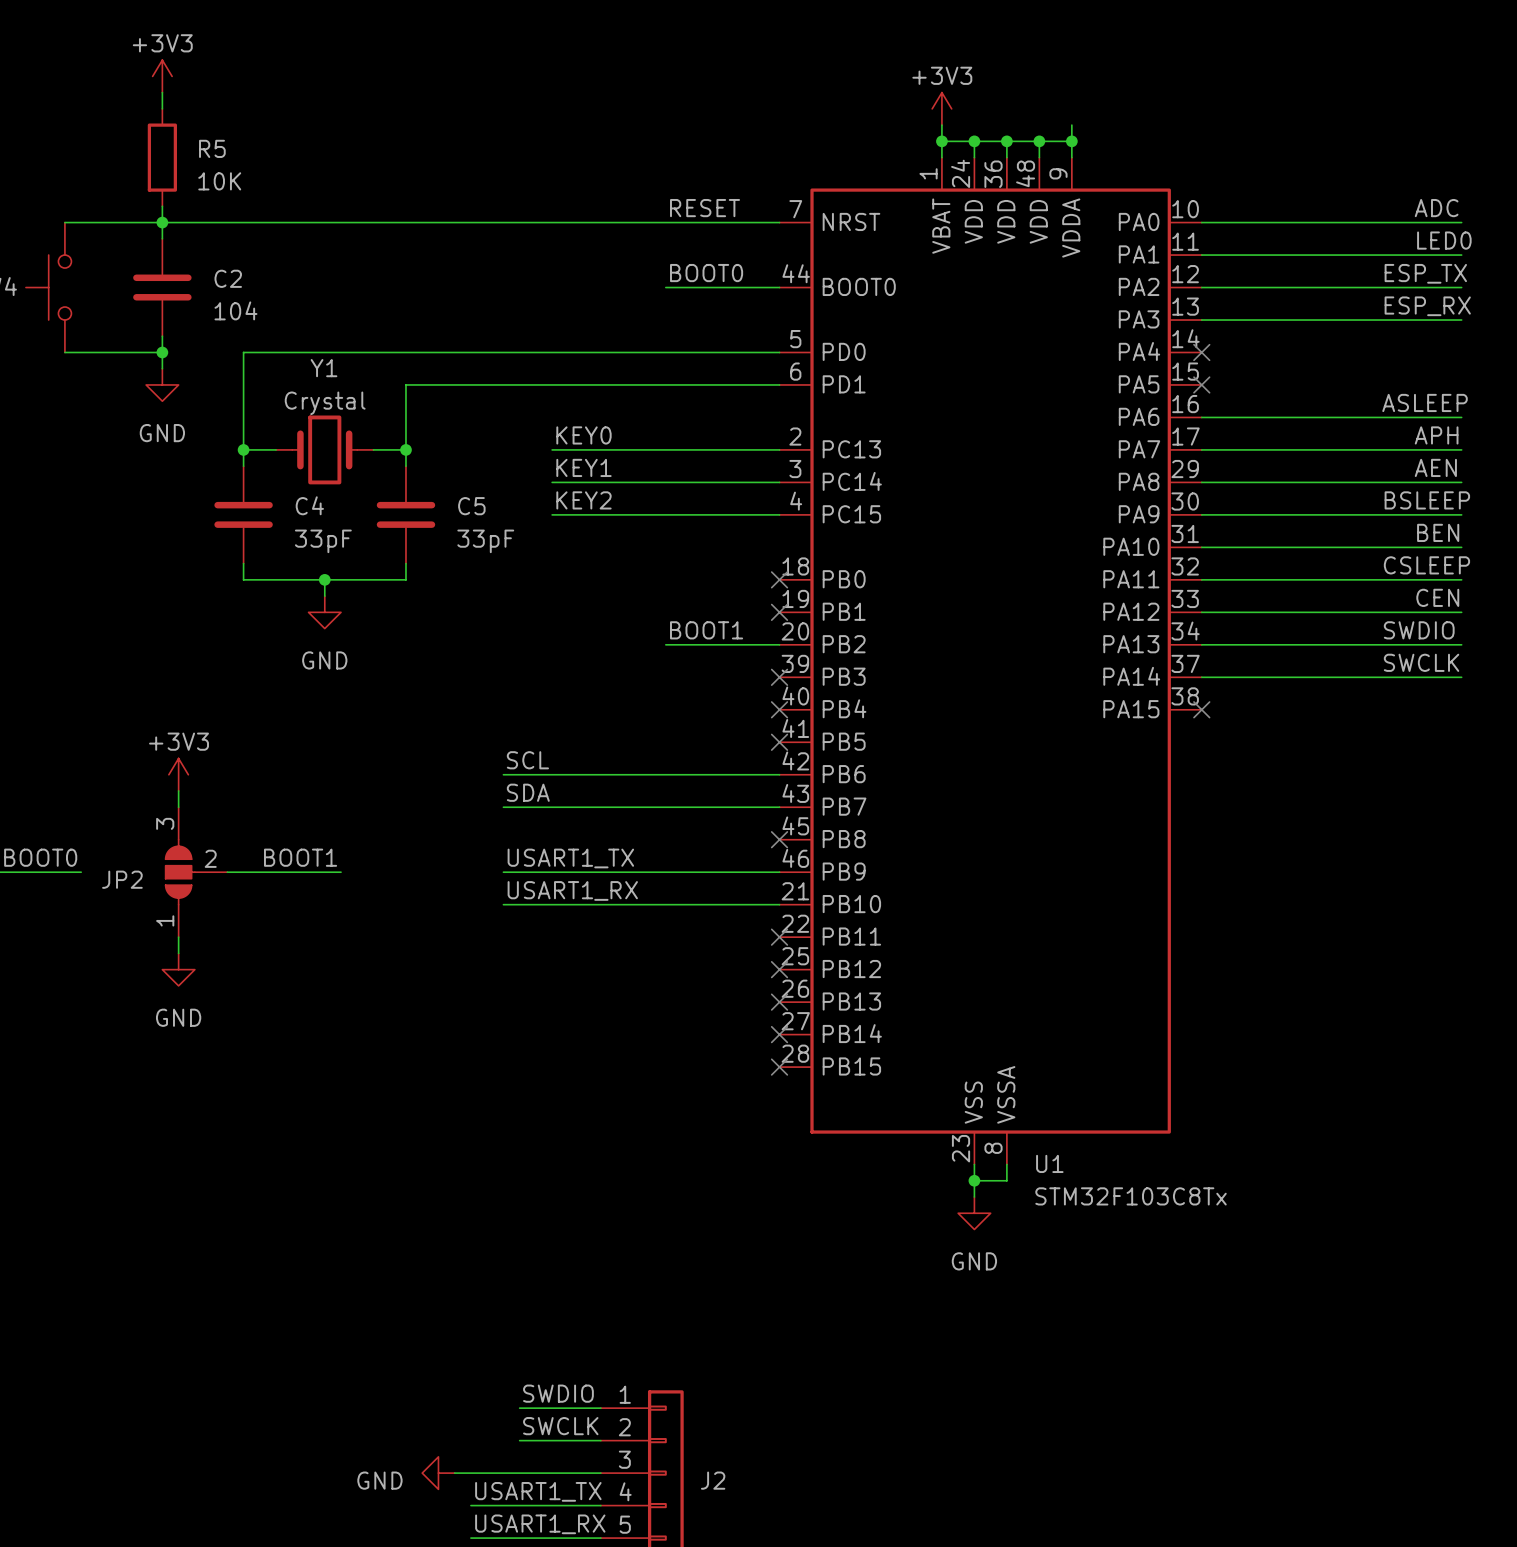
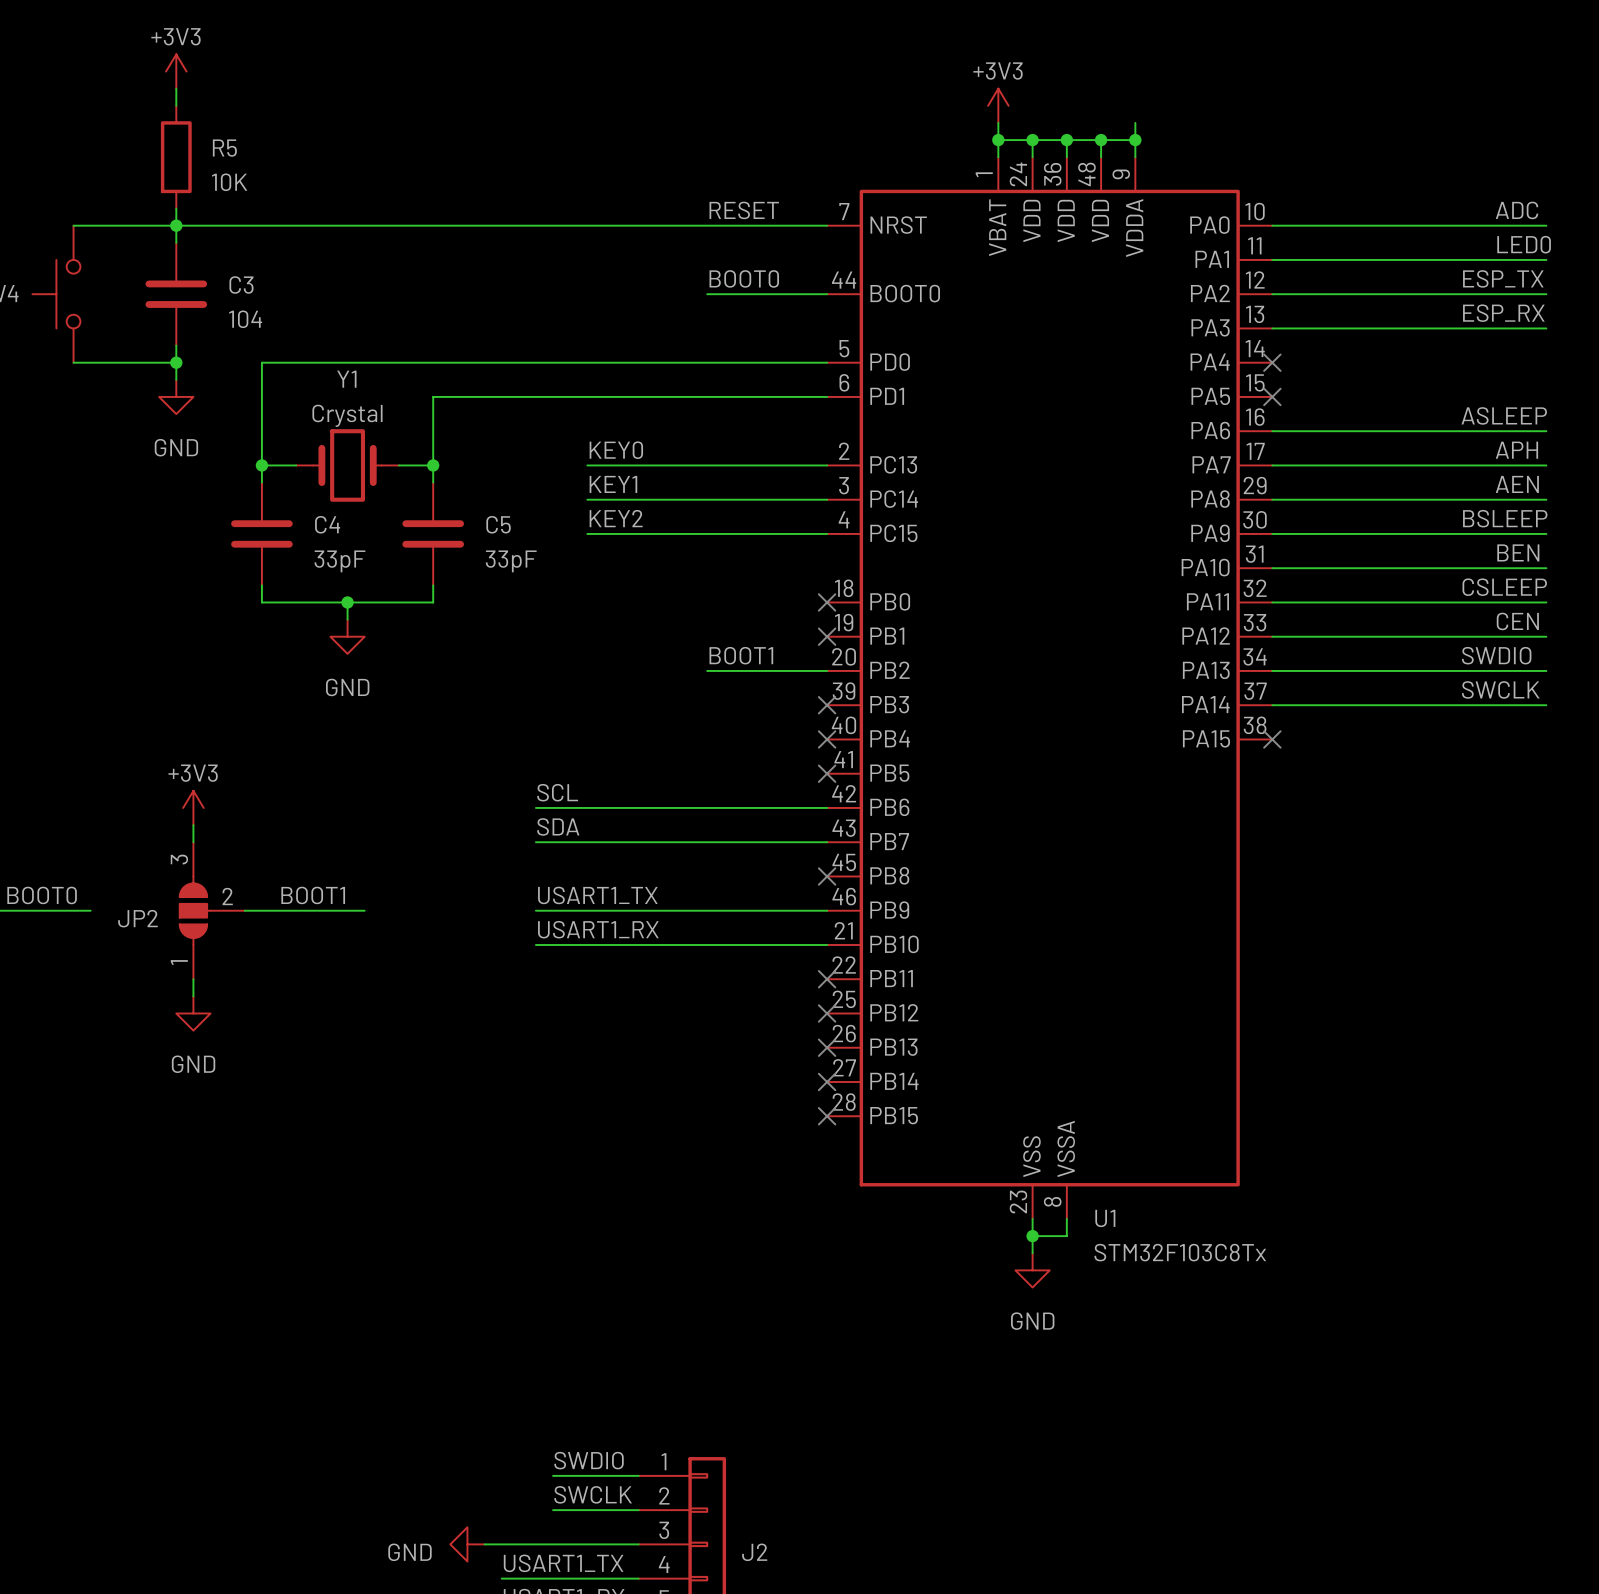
C2 name: C2 (228, 278) -> C3 (241, 285)

